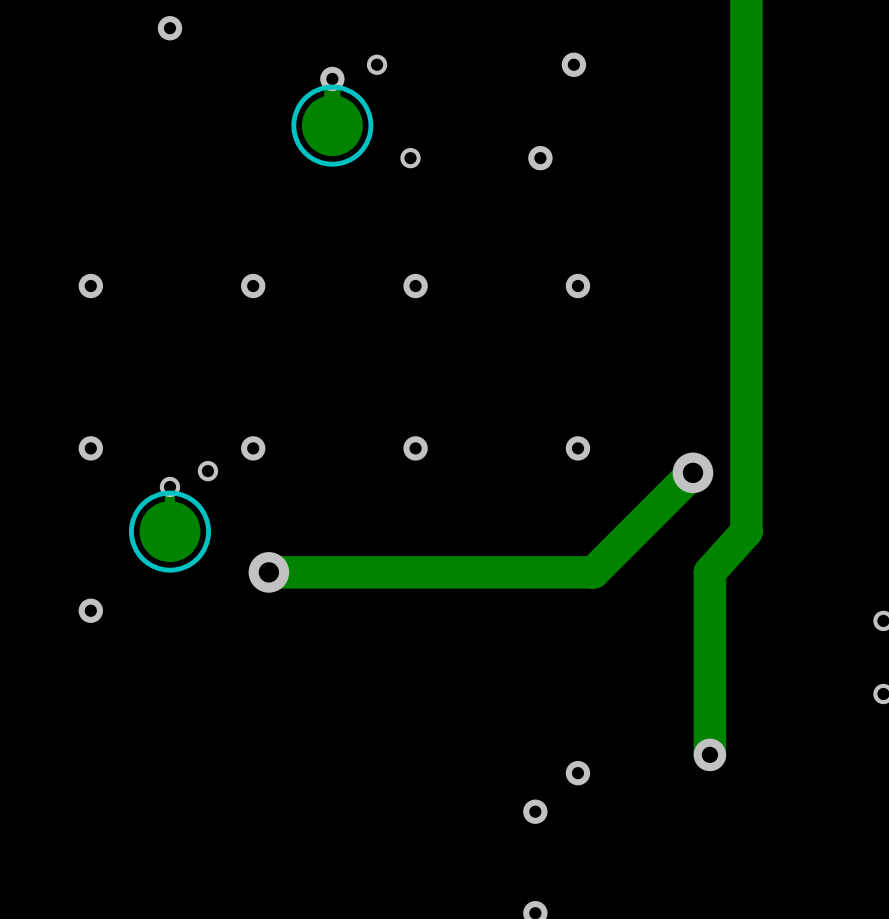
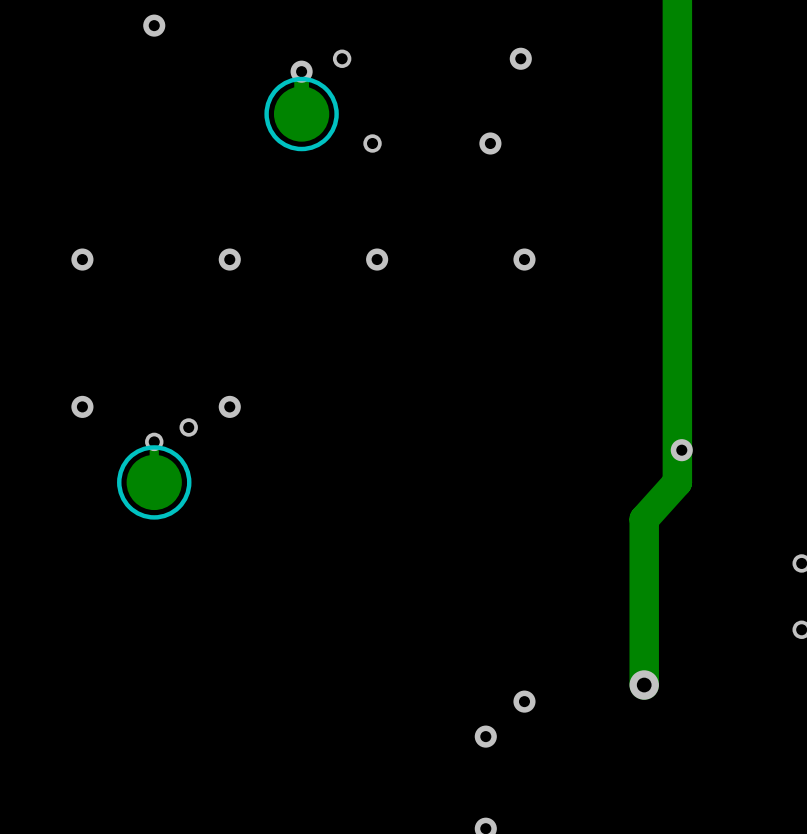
via: (415, 448) -> none
via: (577, 448) -> none
track: (692, 472) (593, 572) (268, 572) -> none
via: (692, 472) -> none
via: none -> (681, 450)
via: (268, 572) -> none
via: (90, 610) -> none

